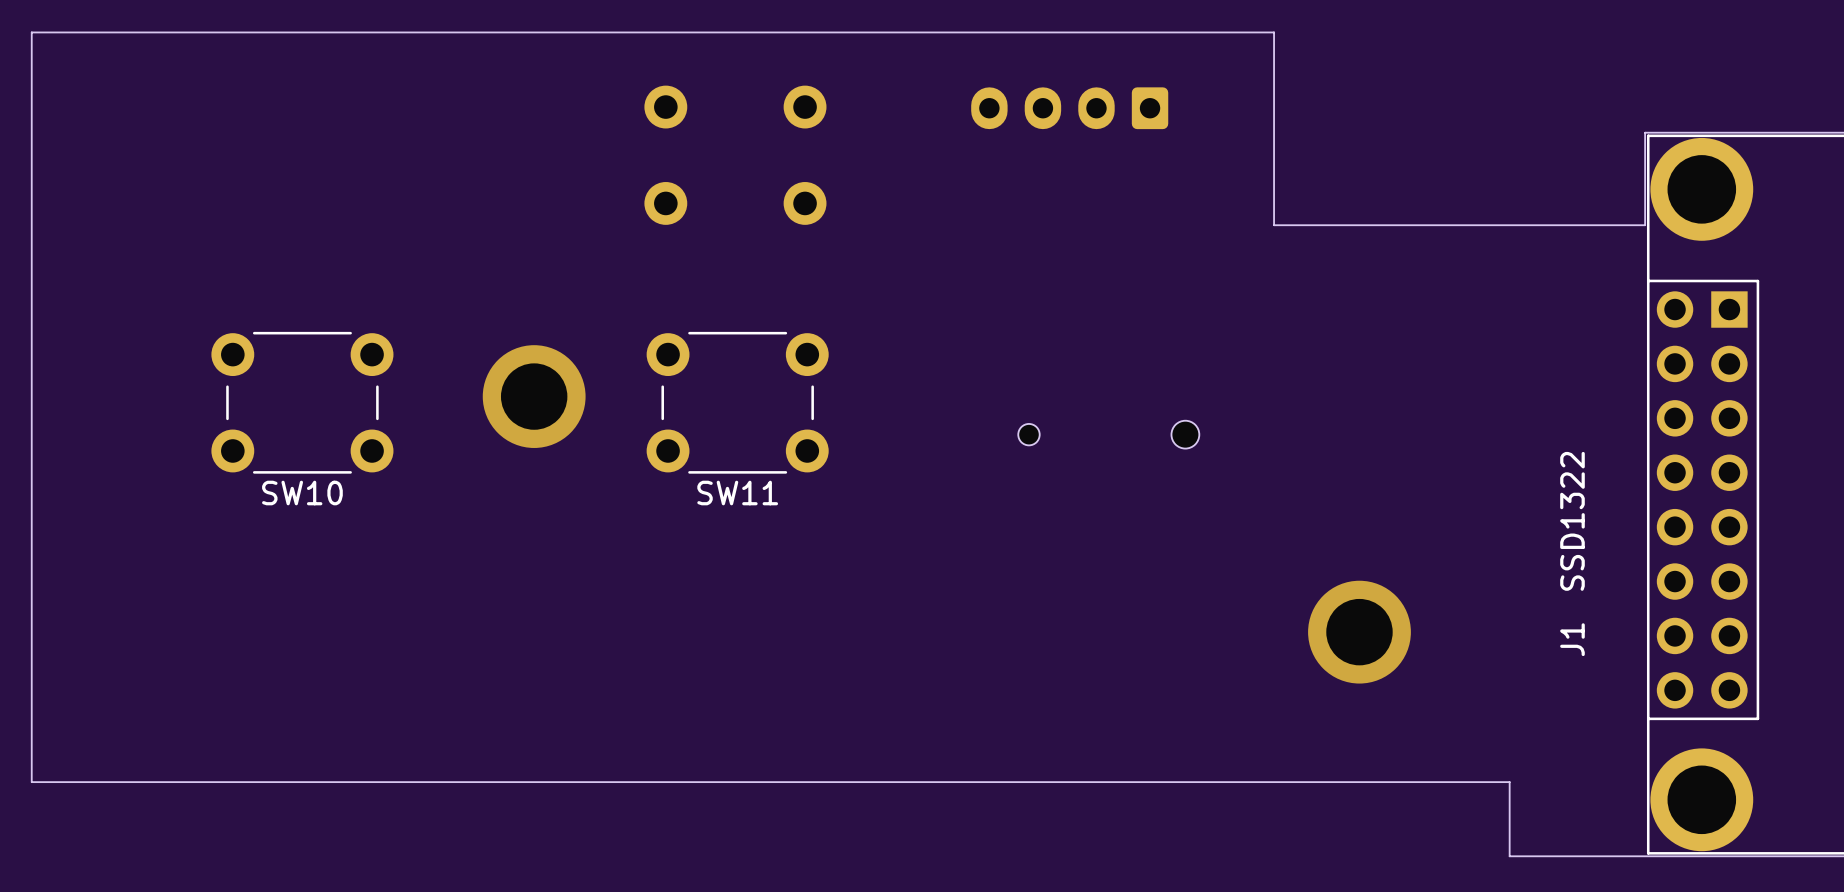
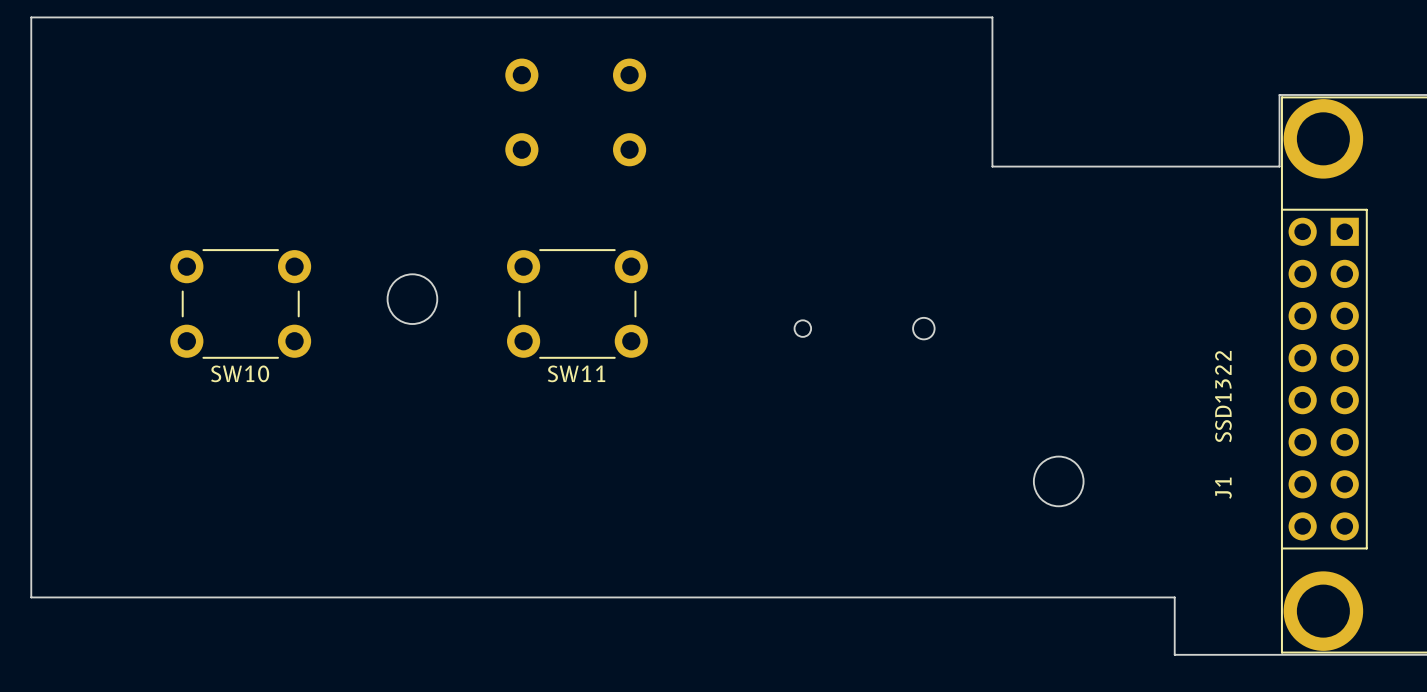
part: (1069, 108) -> none
round board edge: none -> [387, 273, 438, 325]
via: (534, 396) -> none
round board edge: none -> [1033, 456, 1084, 507]
via: (1359, 632) -> none

